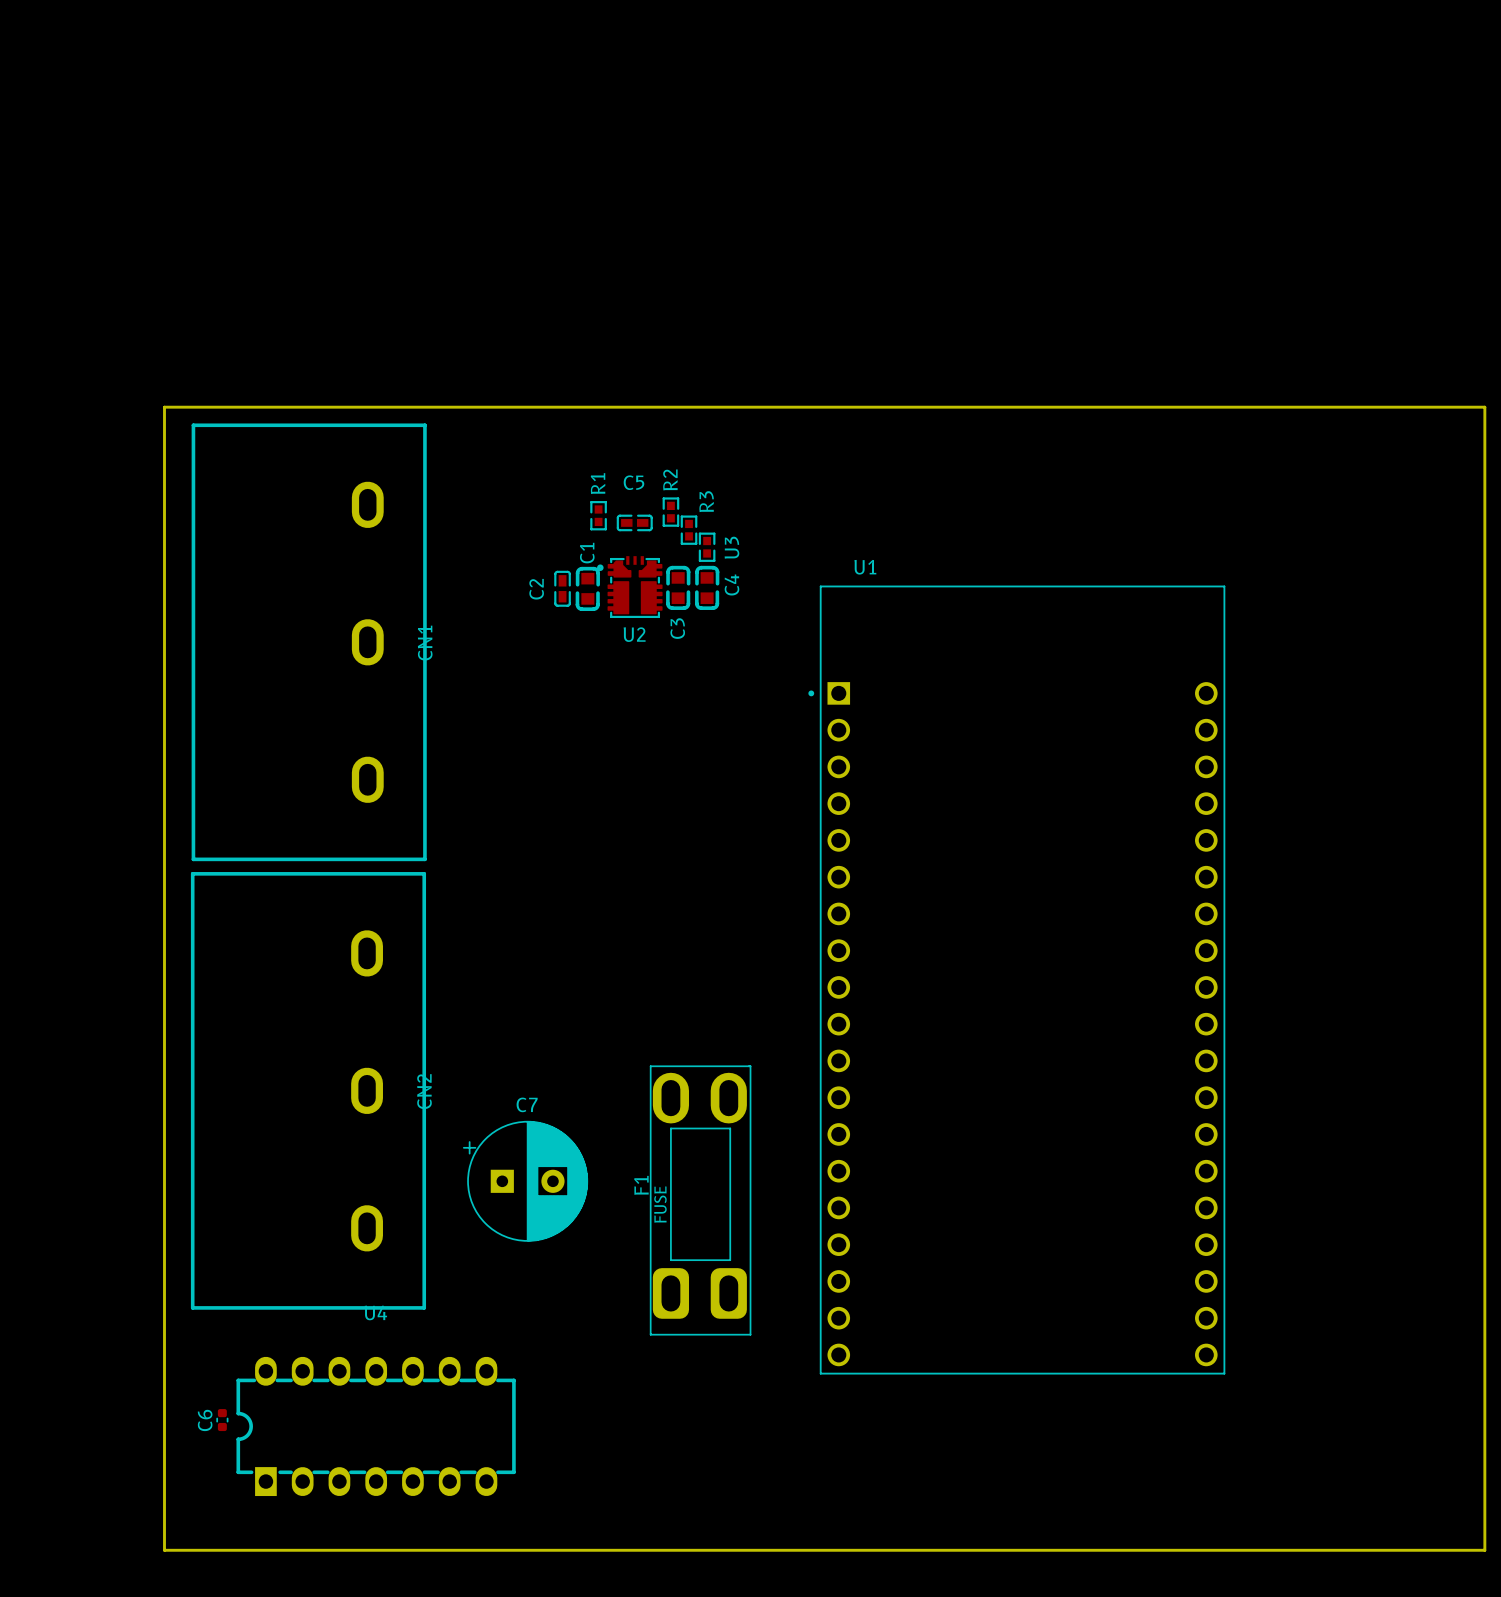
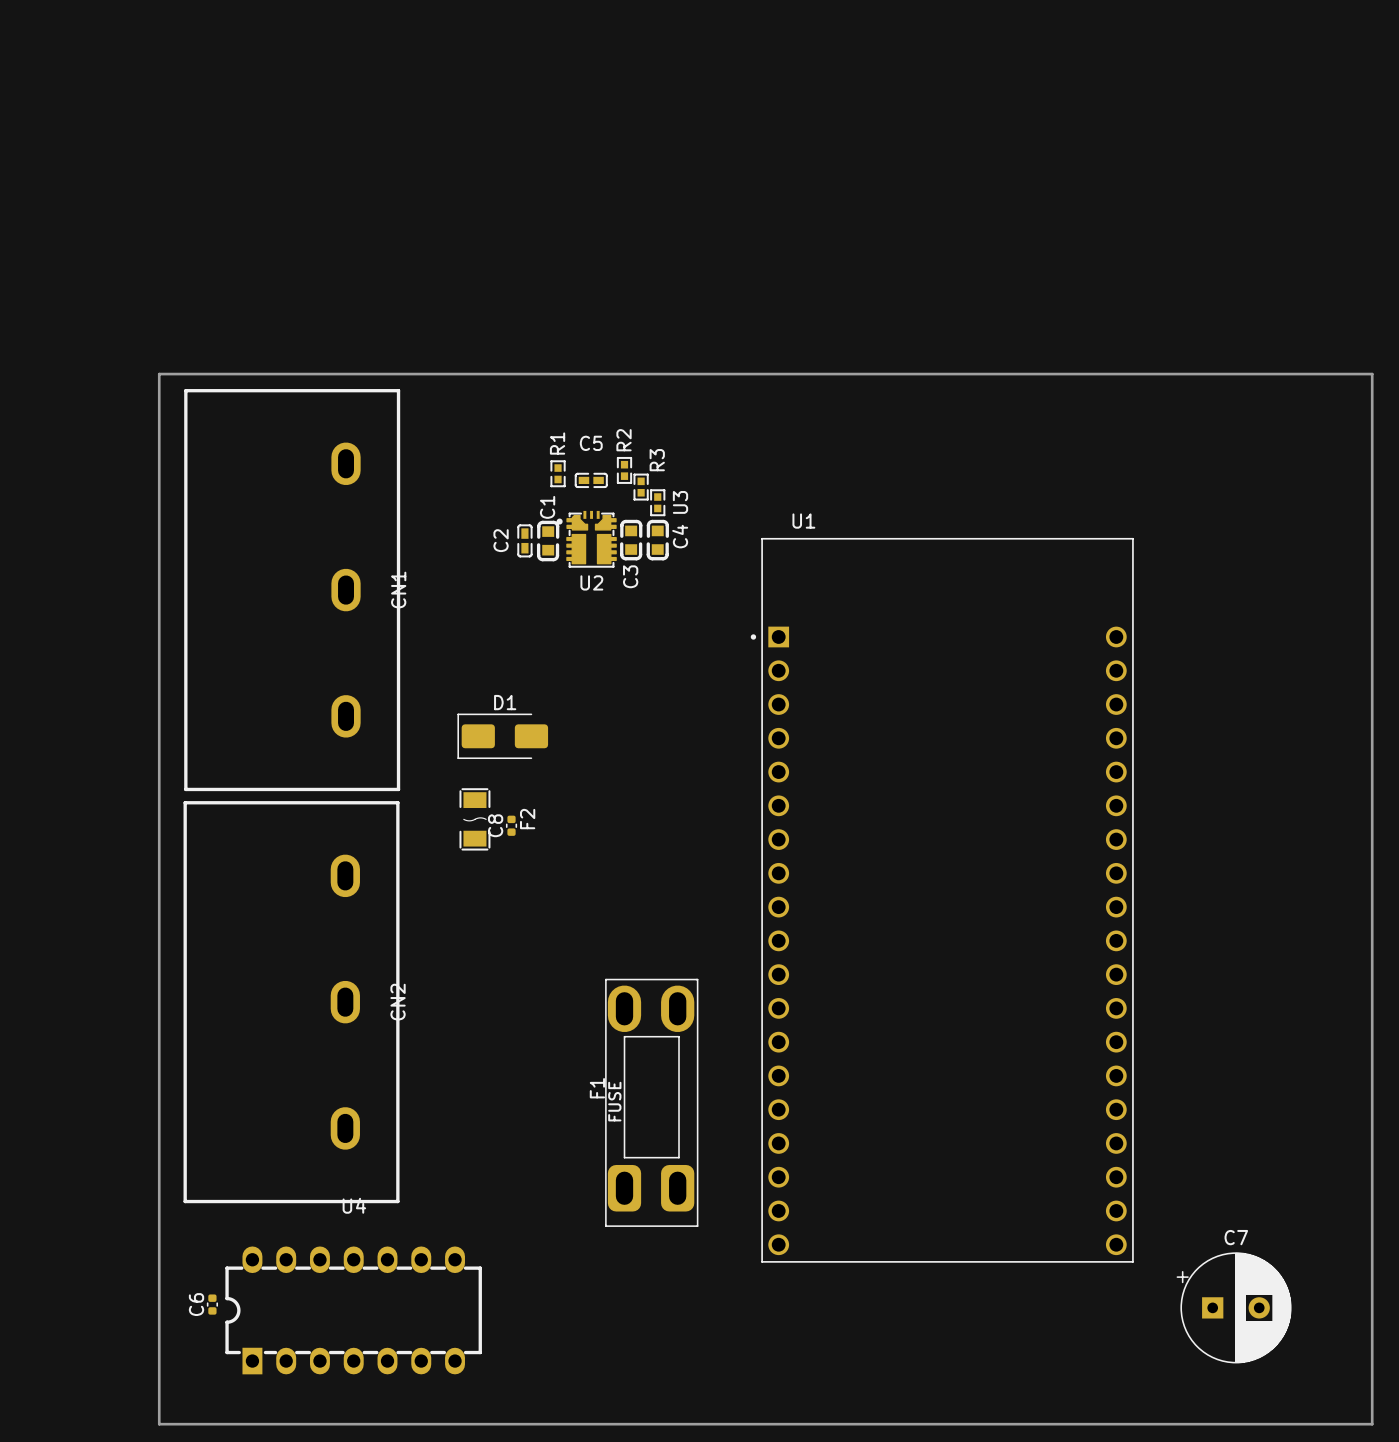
D1: none -> (502, 736)
F2: none -> (474, 819)
C8: none -> (511, 825)
C7 position: (525, 1181) -> (1234, 1307)

